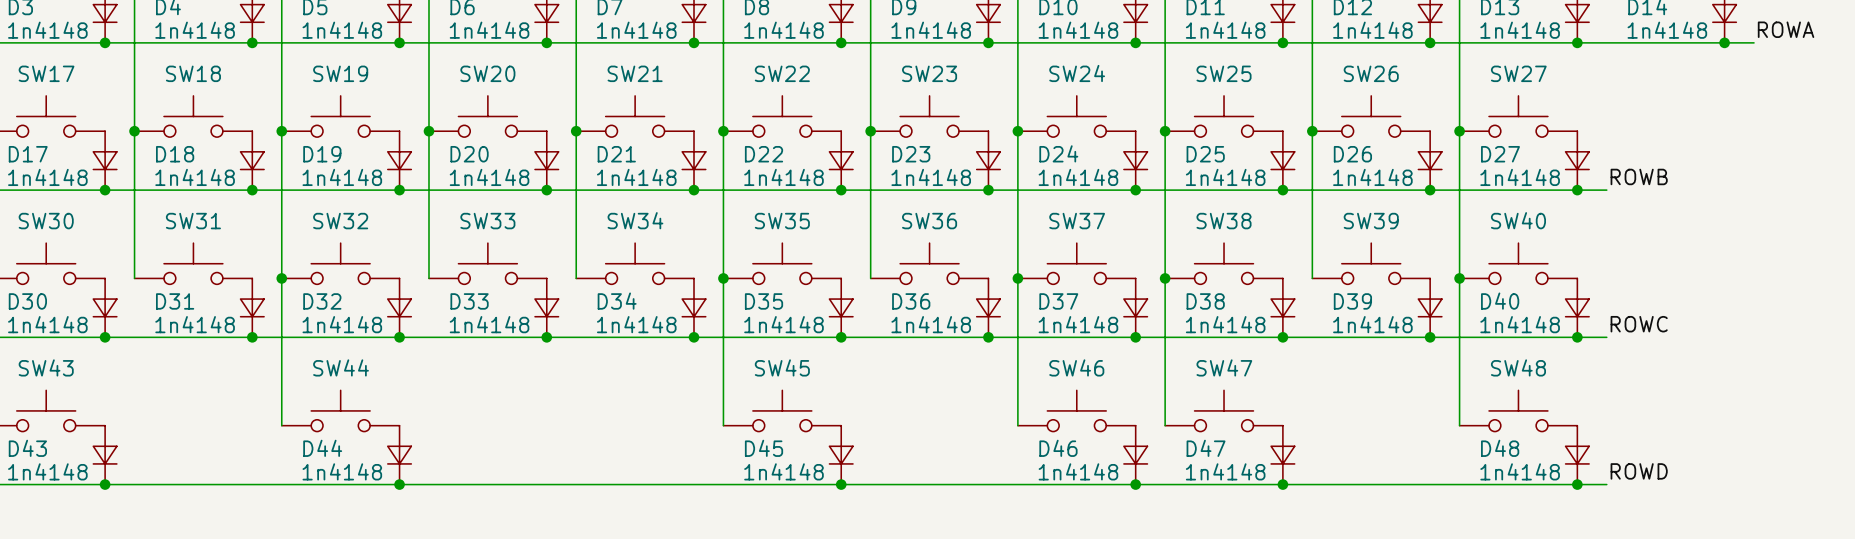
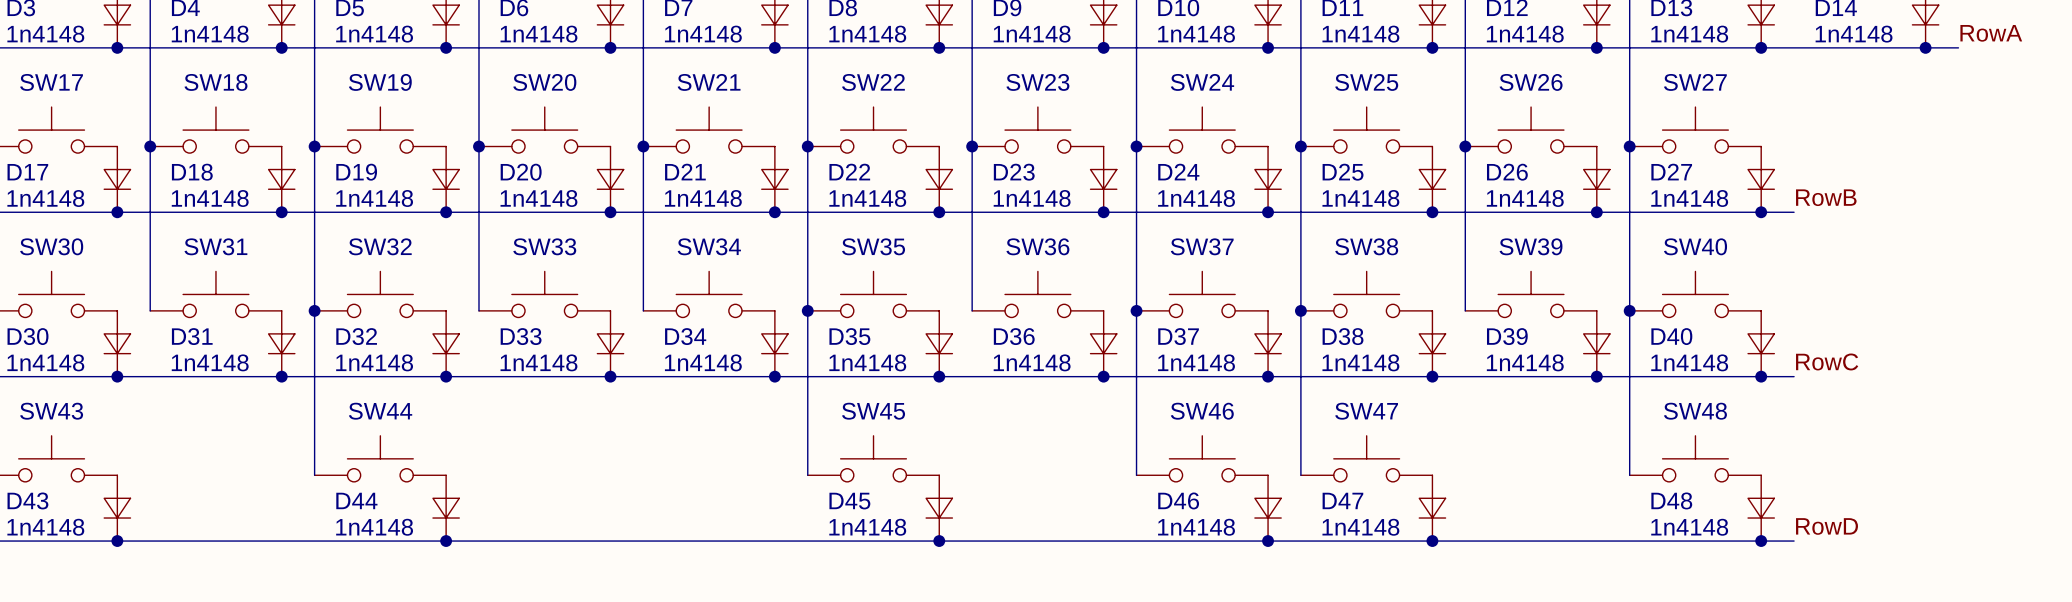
label: ROWA (1786, 29) -> RowA (1991, 33)
label: ROWB (1639, 176) -> RowB (1826, 197)
label: ROWC (1639, 324) -> RowC (1827, 361)
label: ROWD (1639, 471) -> RowD (1827, 526)

